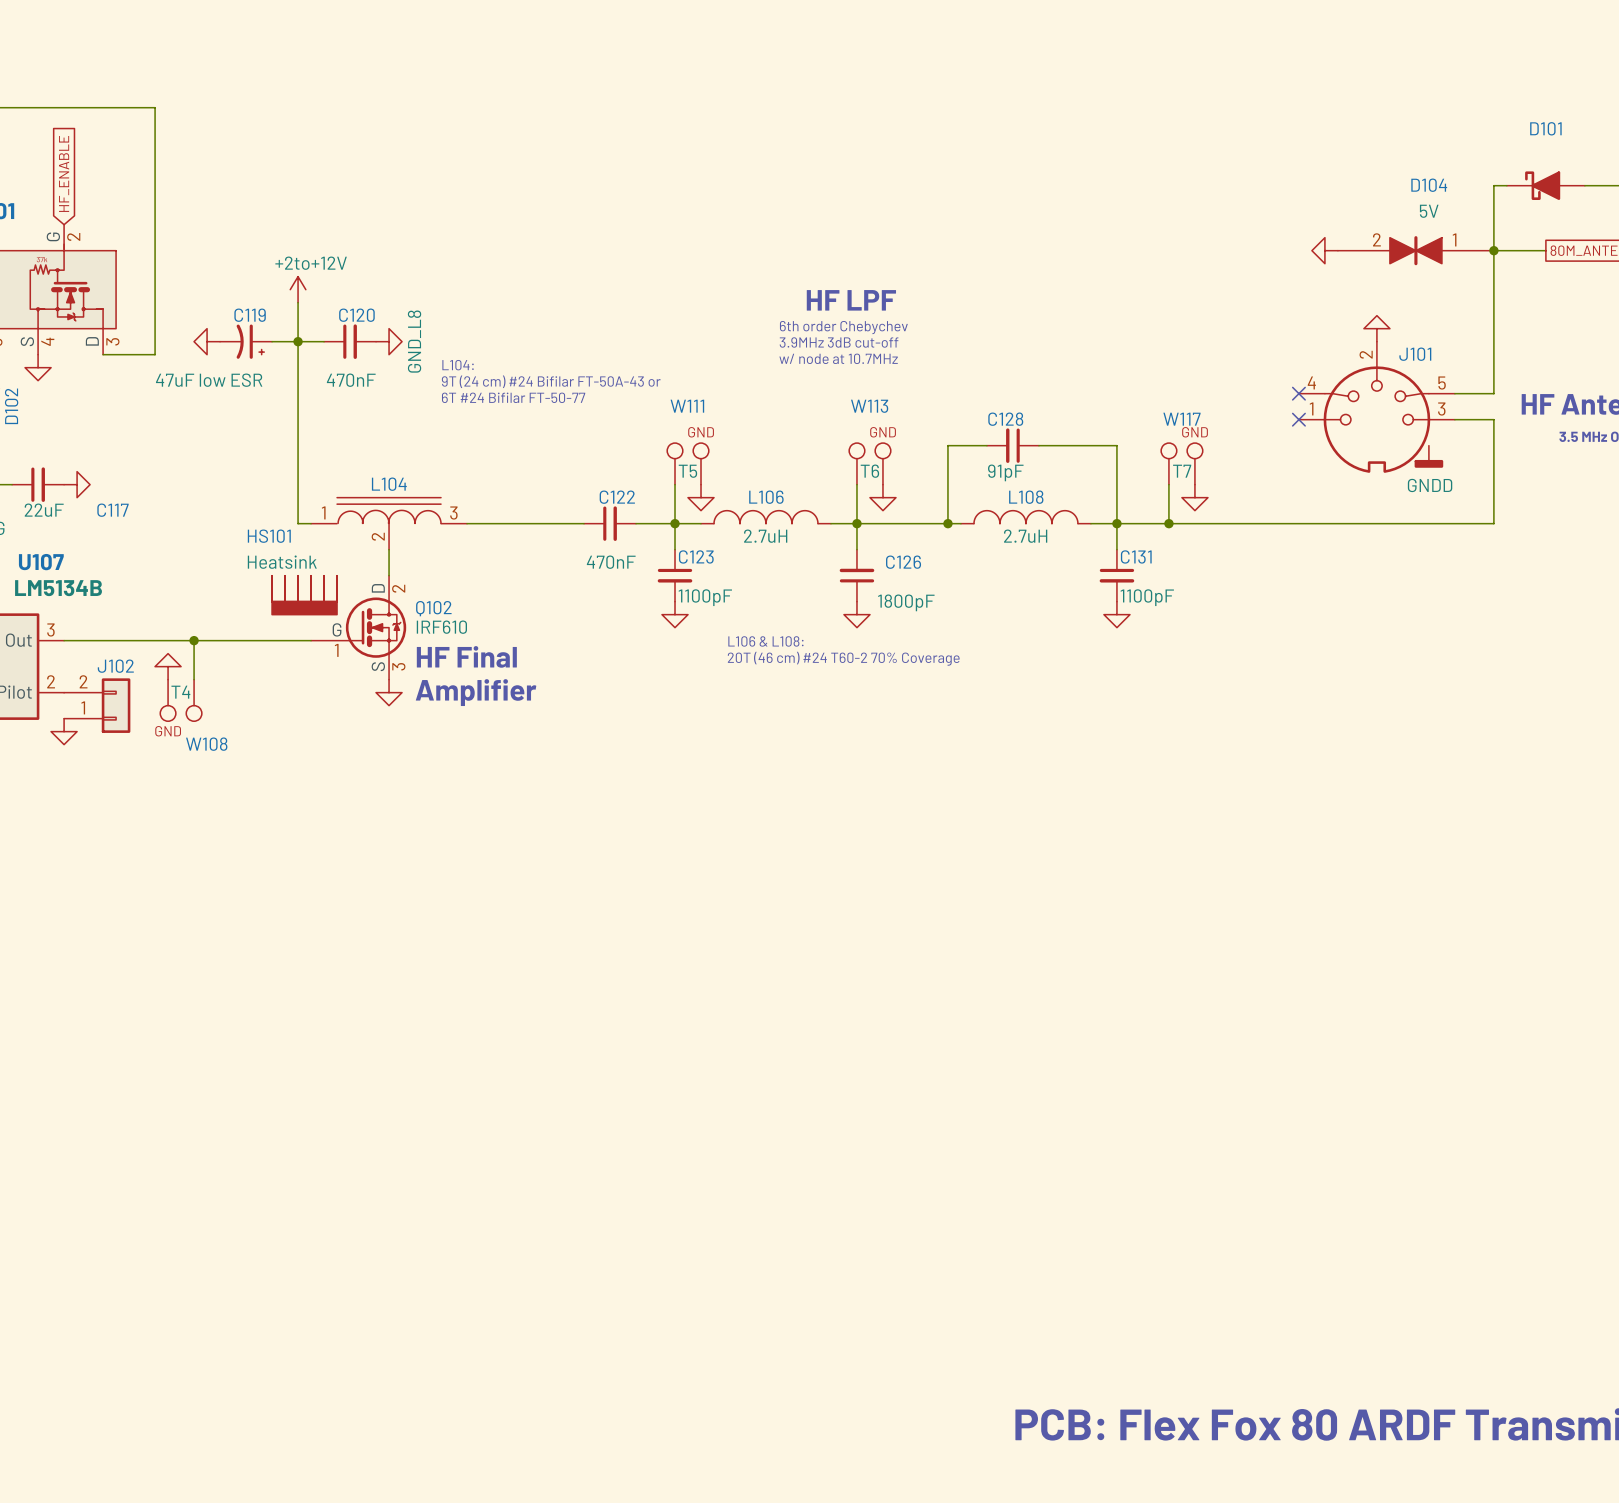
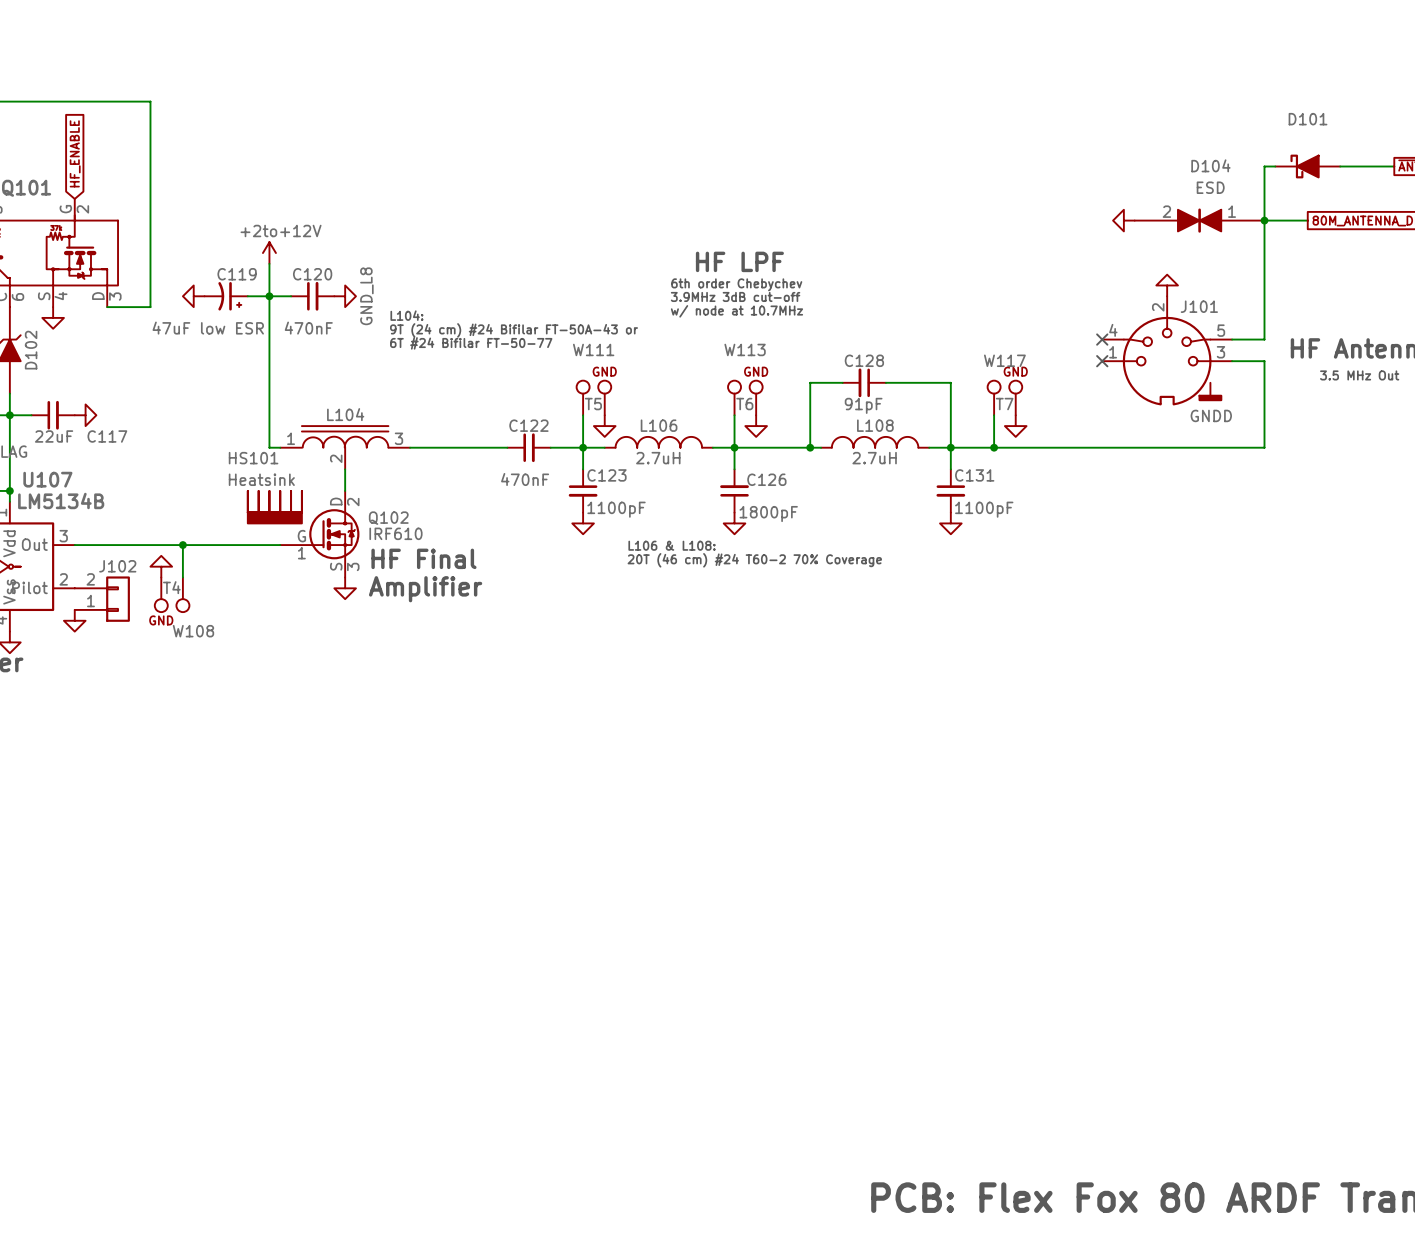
D104 value: 5V (1429, 211) -> ESD (1210, 187)

